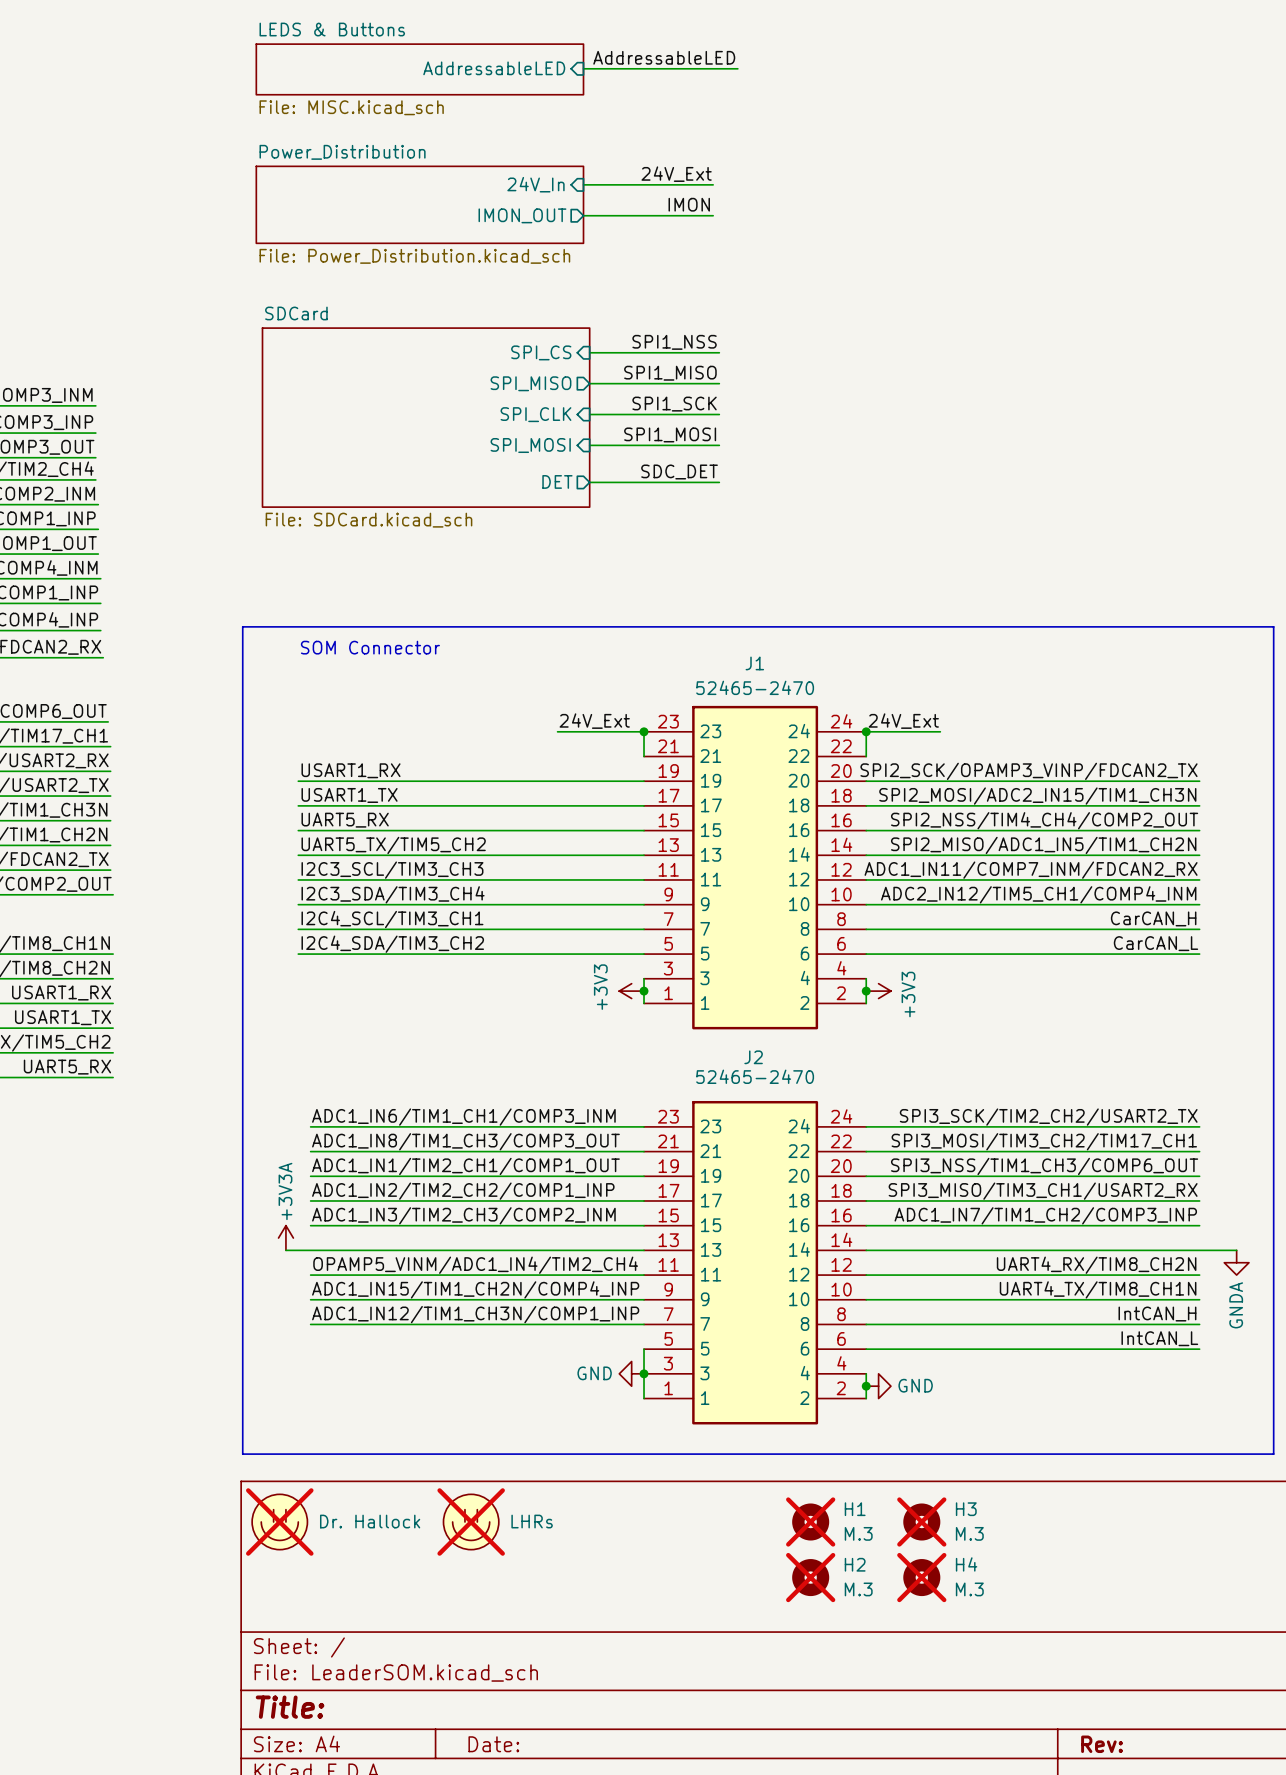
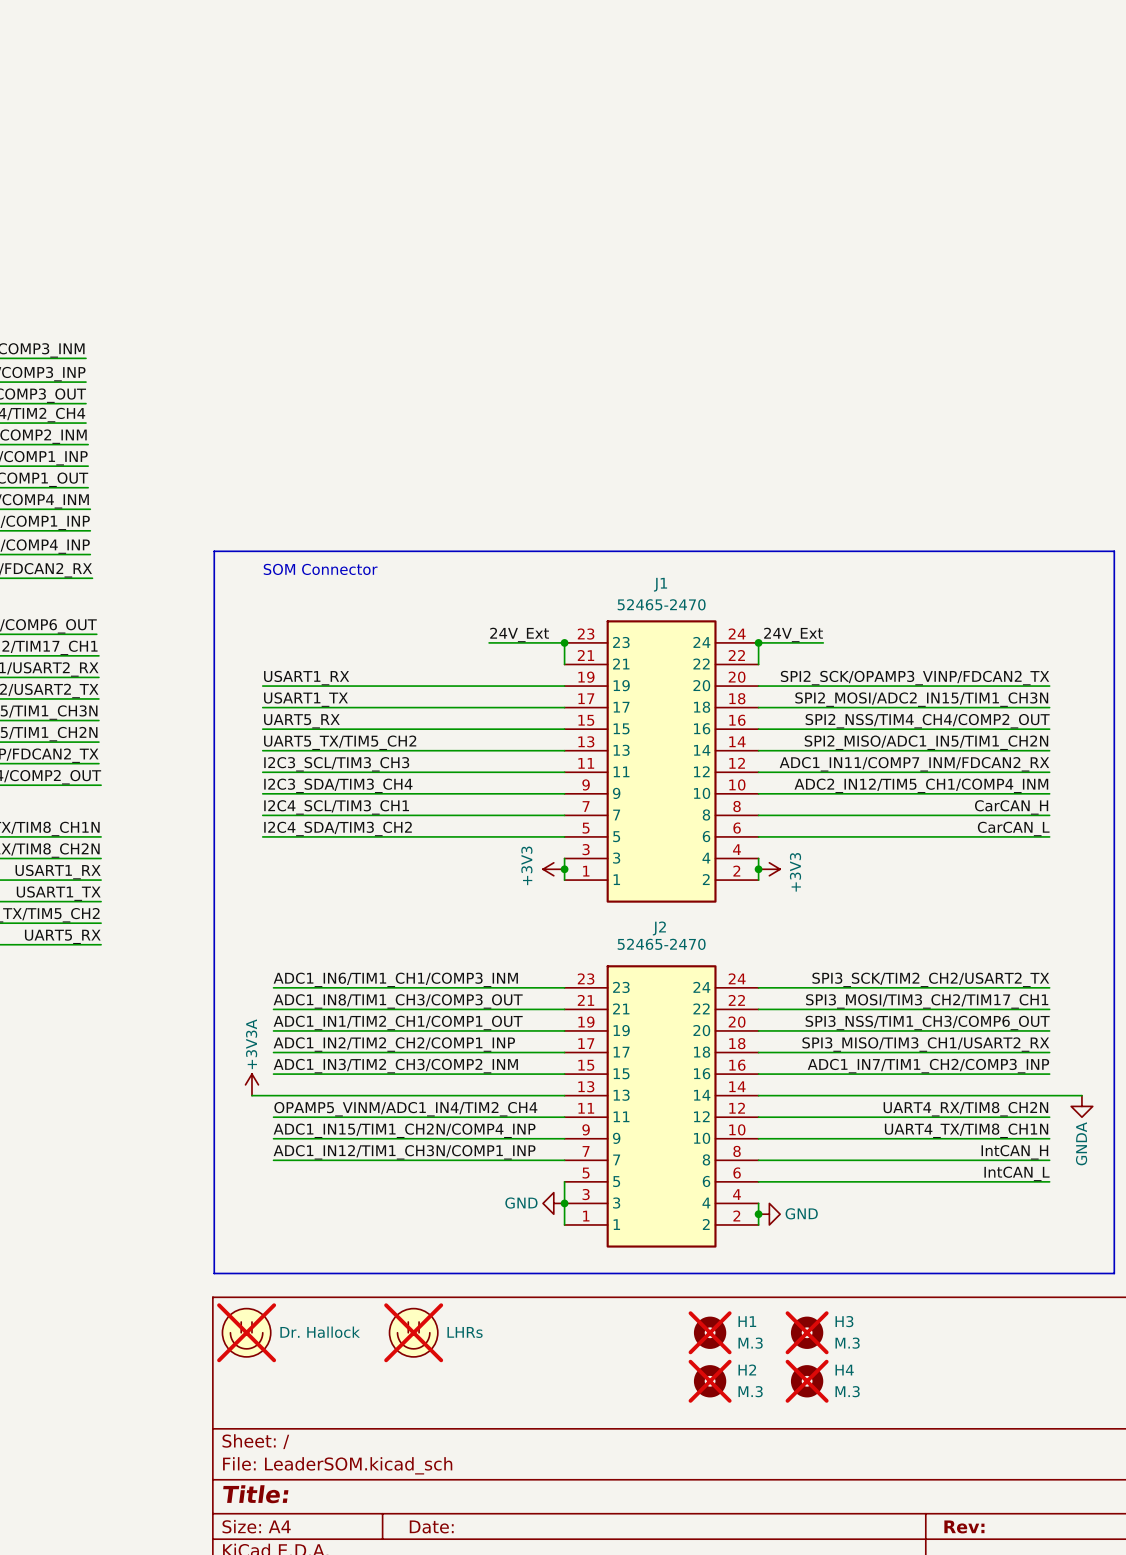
label: AddressableLED (664, 57) -> none
sheet pin: AddressableLED (494, 68) -> none
wire: (583, 68) (737, 68) -> none
sheet LEDS & Buttons: File: MISC.kicad_sch (419, 69) -> none
label: 24V_Ext (676, 174) -> none
sheet pin: 24V_In (535, 184) -> none
wire: (583, 184) (713, 184) -> none
sheet Power_Distribution: File: Power_Distribution.kicad_sch (419, 204) -> none
label: IMON (689, 204) -> none
sheet pin: IMON_OUT (522, 215) -> none
wire: (583, 215) (713, 215) -> none
label: SPI1_NSS (674, 342) -> none
sheet pin: SPI_CS (541, 352) -> none
wire: (589, 352) (719, 352) -> none
label: SPI1_MISO (670, 373) -> none
sheet pin: SPI_MISO (530, 383) -> none
wire: (589, 383) (719, 383) -> none
label: SPI1_SCK (674, 404) -> none
sheet pin: SPI_CLK (535, 414) -> none
wire: (589, 414) (719, 414) -> none
sheet SDCard: File: SDCard.kicad_sch (426, 417) -> none
label: SPI1_MOSI (670, 434) -> none
sheet pin: SPI_MOSI (530, 445) -> none
wire: (589, 445) (719, 445) -> none
label: SDC_DET (679, 471) -> none
sheet pin: DET (557, 481) -> none
wire: (589, 482) (719, 482) -> none

